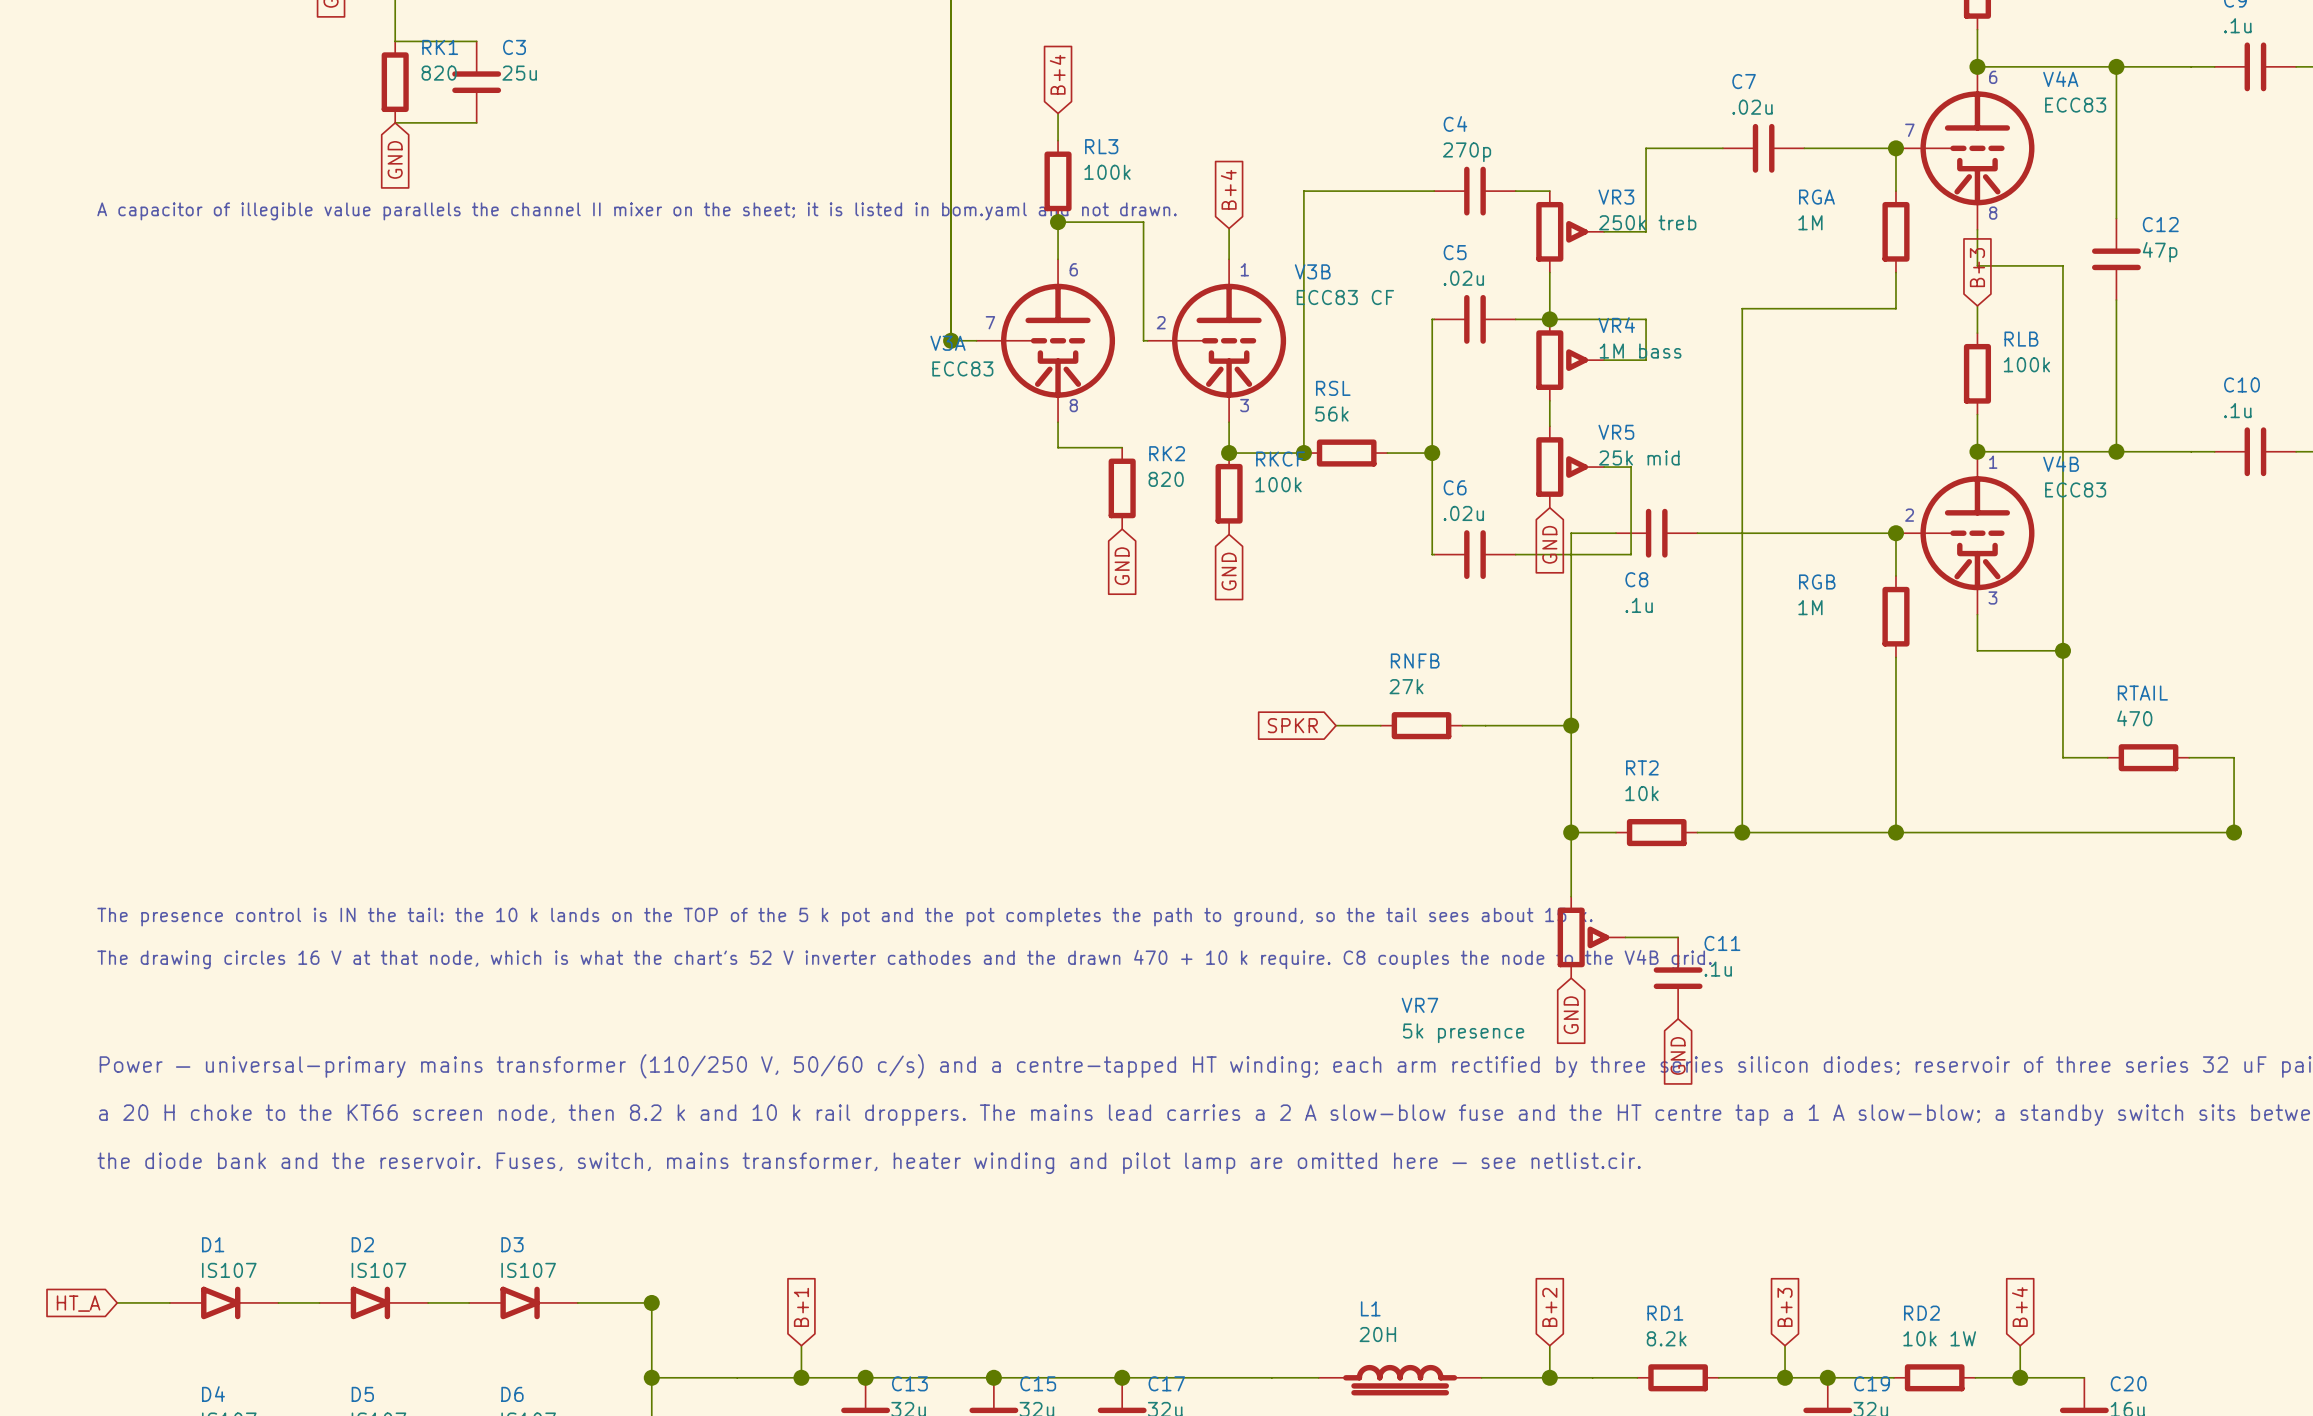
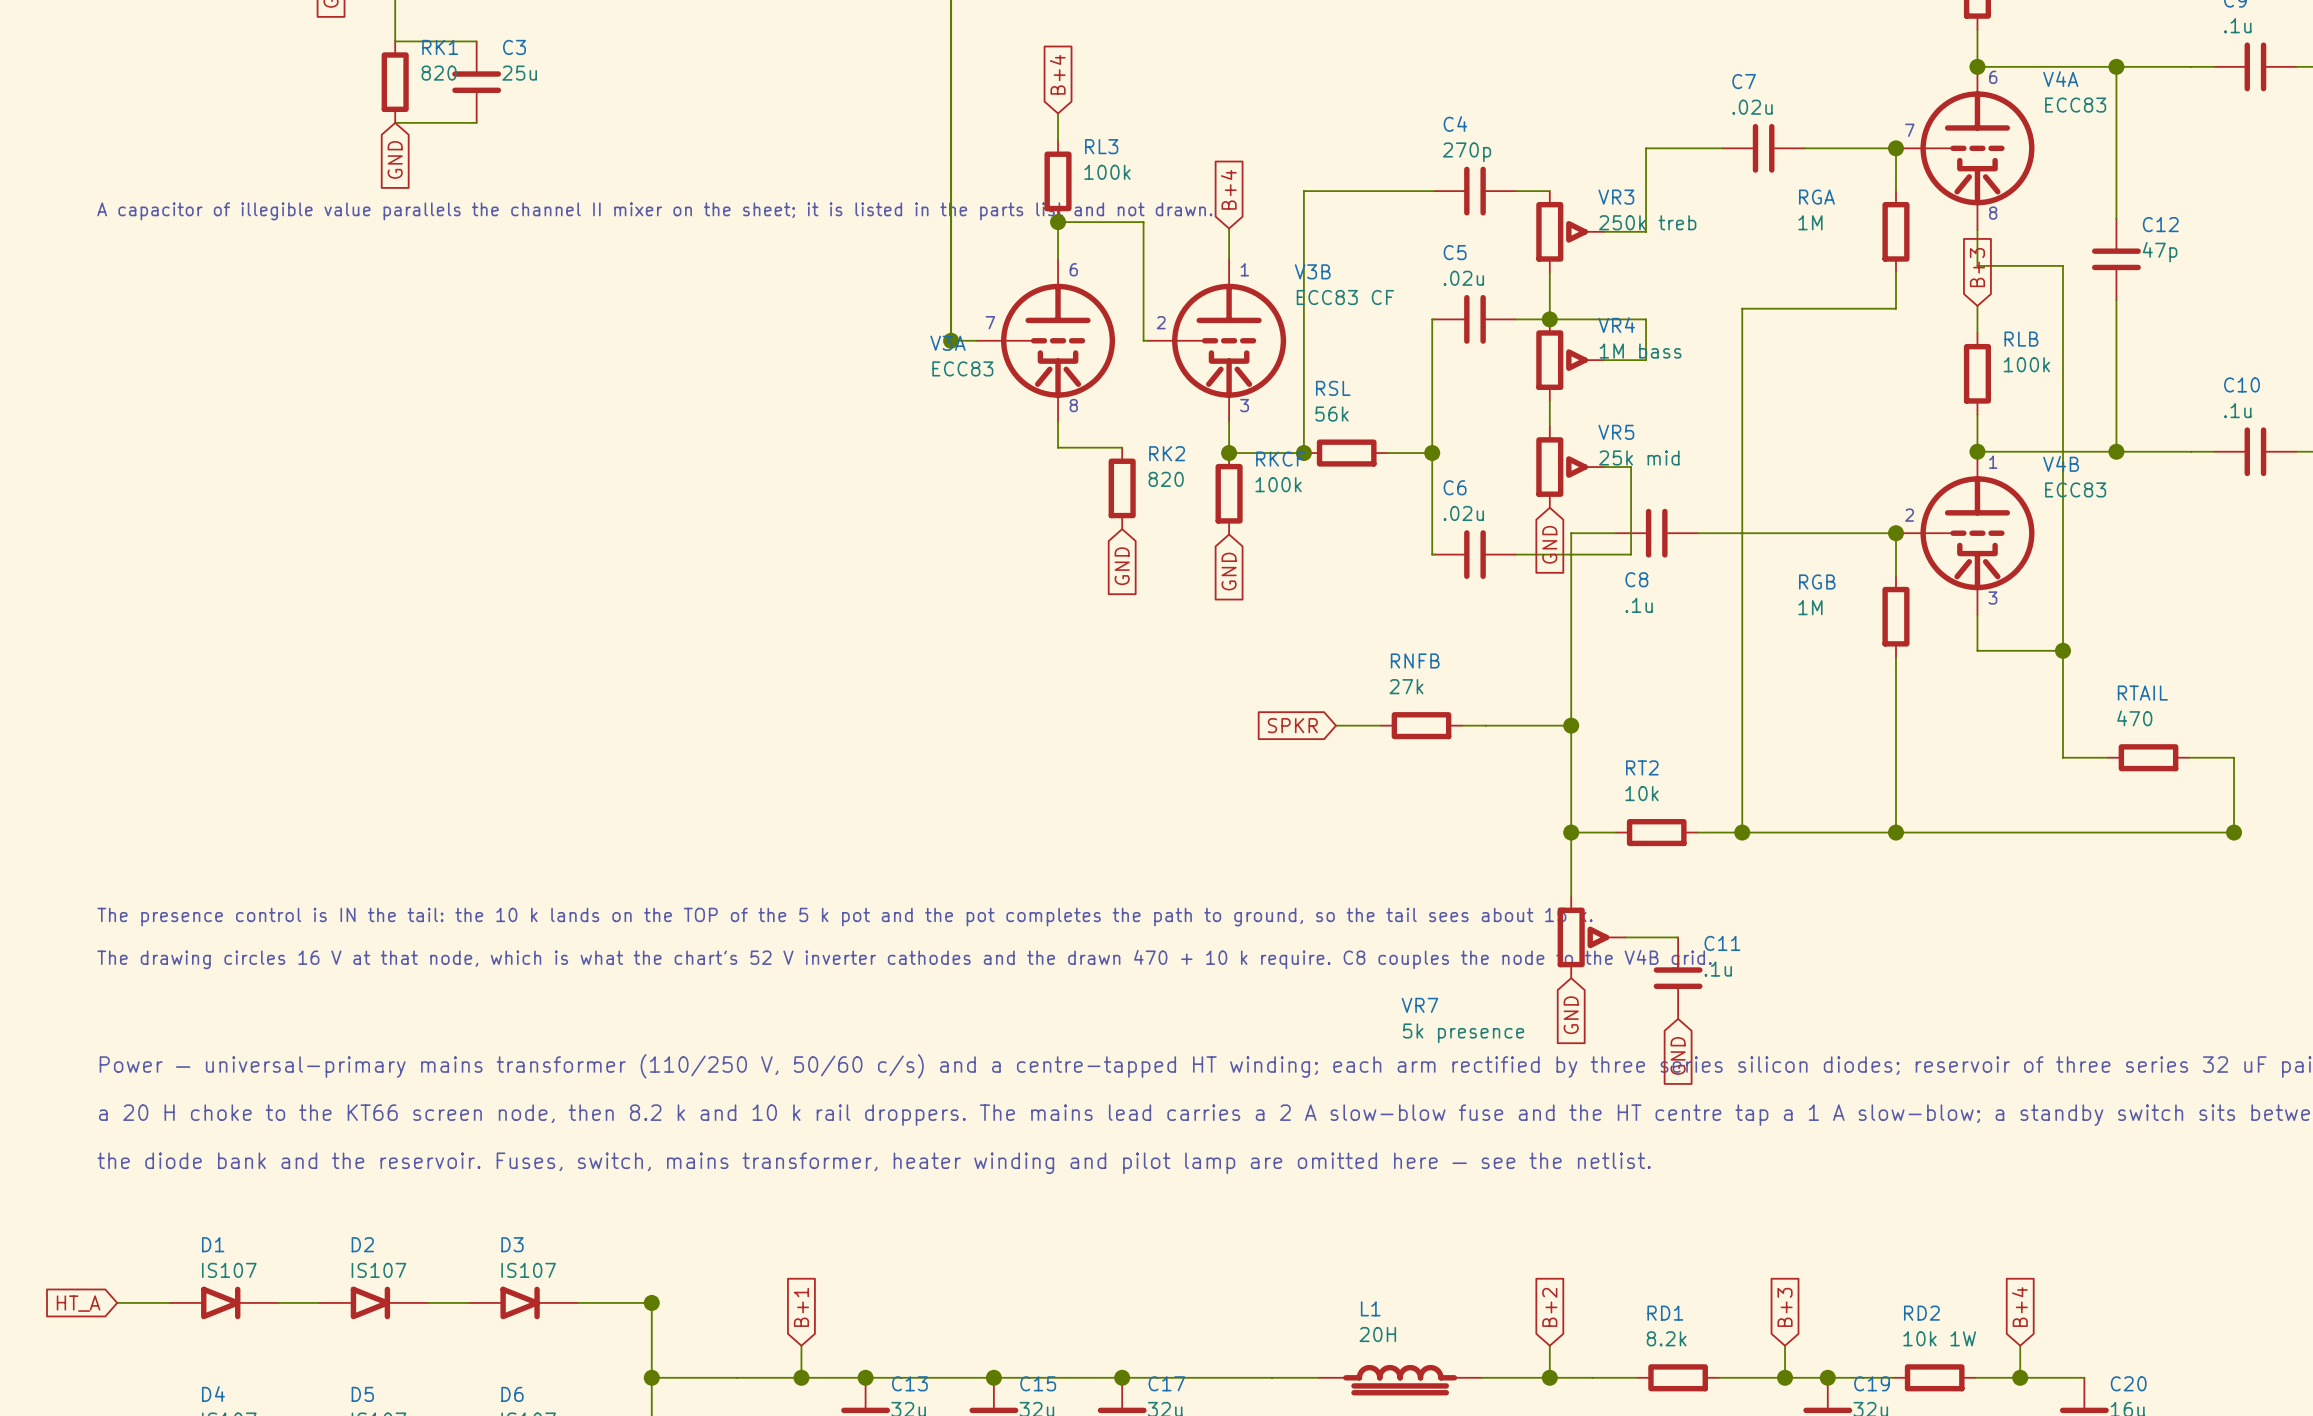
text: A capacitor of illegible value parallels the channel II mixer on the sheet; it is listed in bom.yaml and not drawn. (637, 211) -> A capacitor of illegible value parallels the channel II mixer on the sheet; it is listed in the parts list and not drawn. (654, 211)
text: the diode bank and the reservoir. Fuses, switch, mains transformer, heater winding and pilot lamp are omitted here — see netlist.cir. (869, 1163) -> the diode bank and the reservoir. Fuses, switch, mains transformer, heater winding and pilot lamp are omitted here — see the netlist. (874, 1163)

